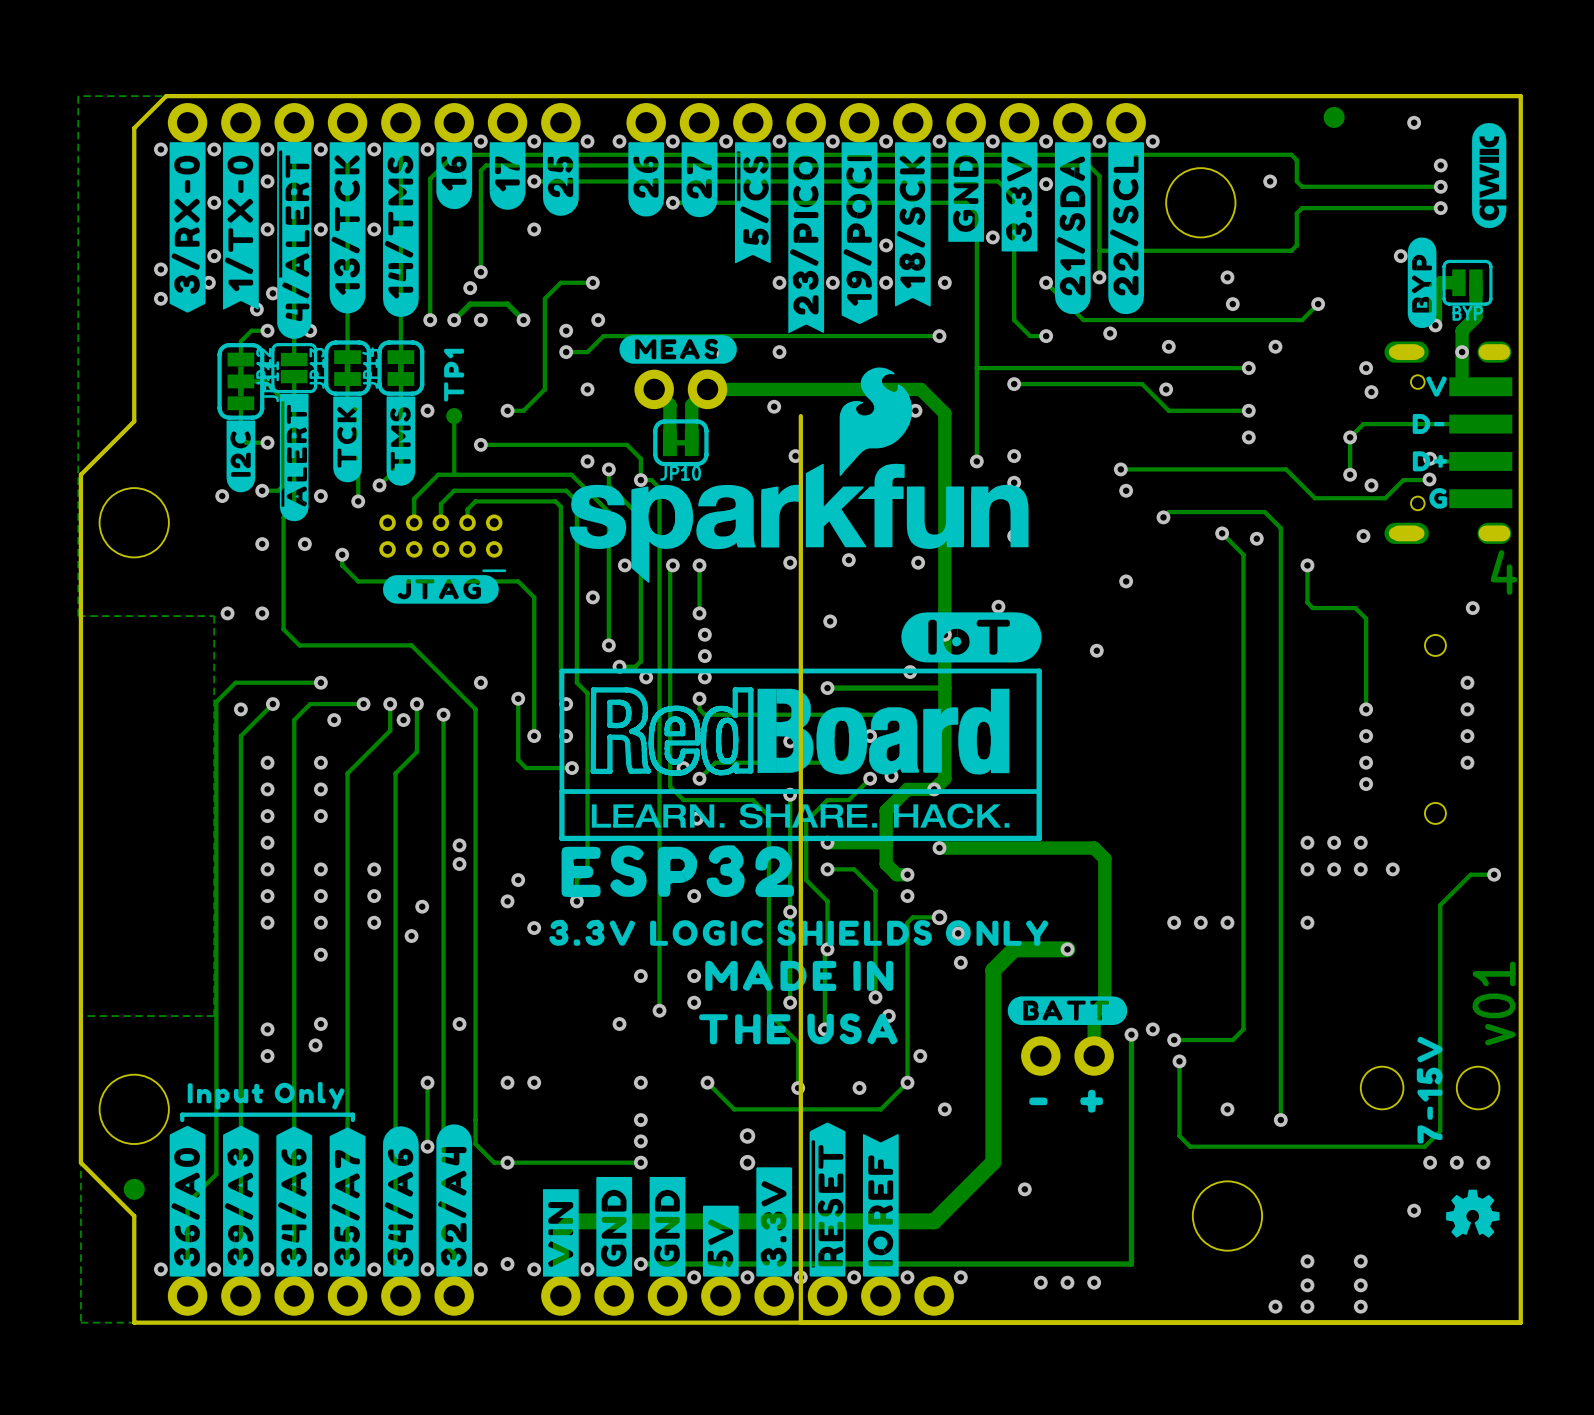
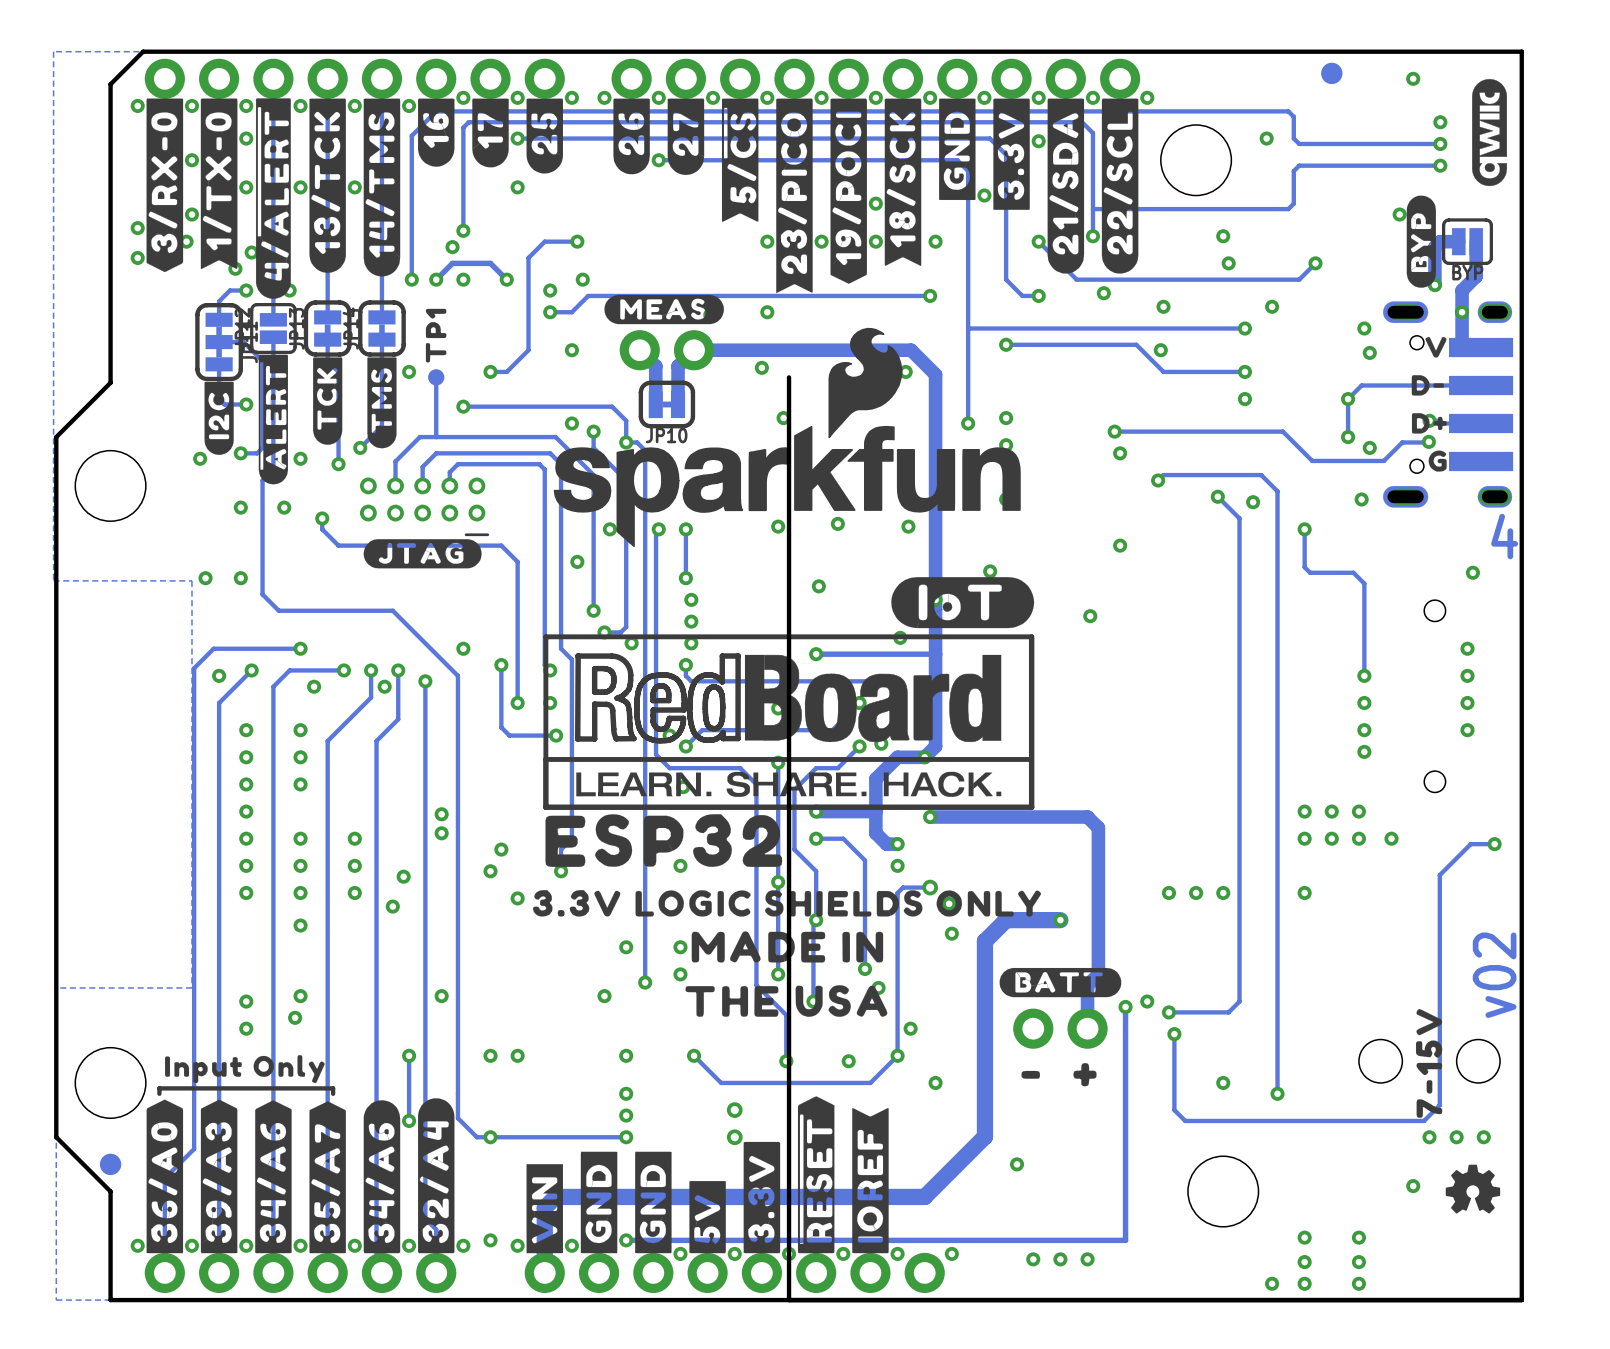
text: v01 (1494, 1003) -> v02 (1494, 975)

